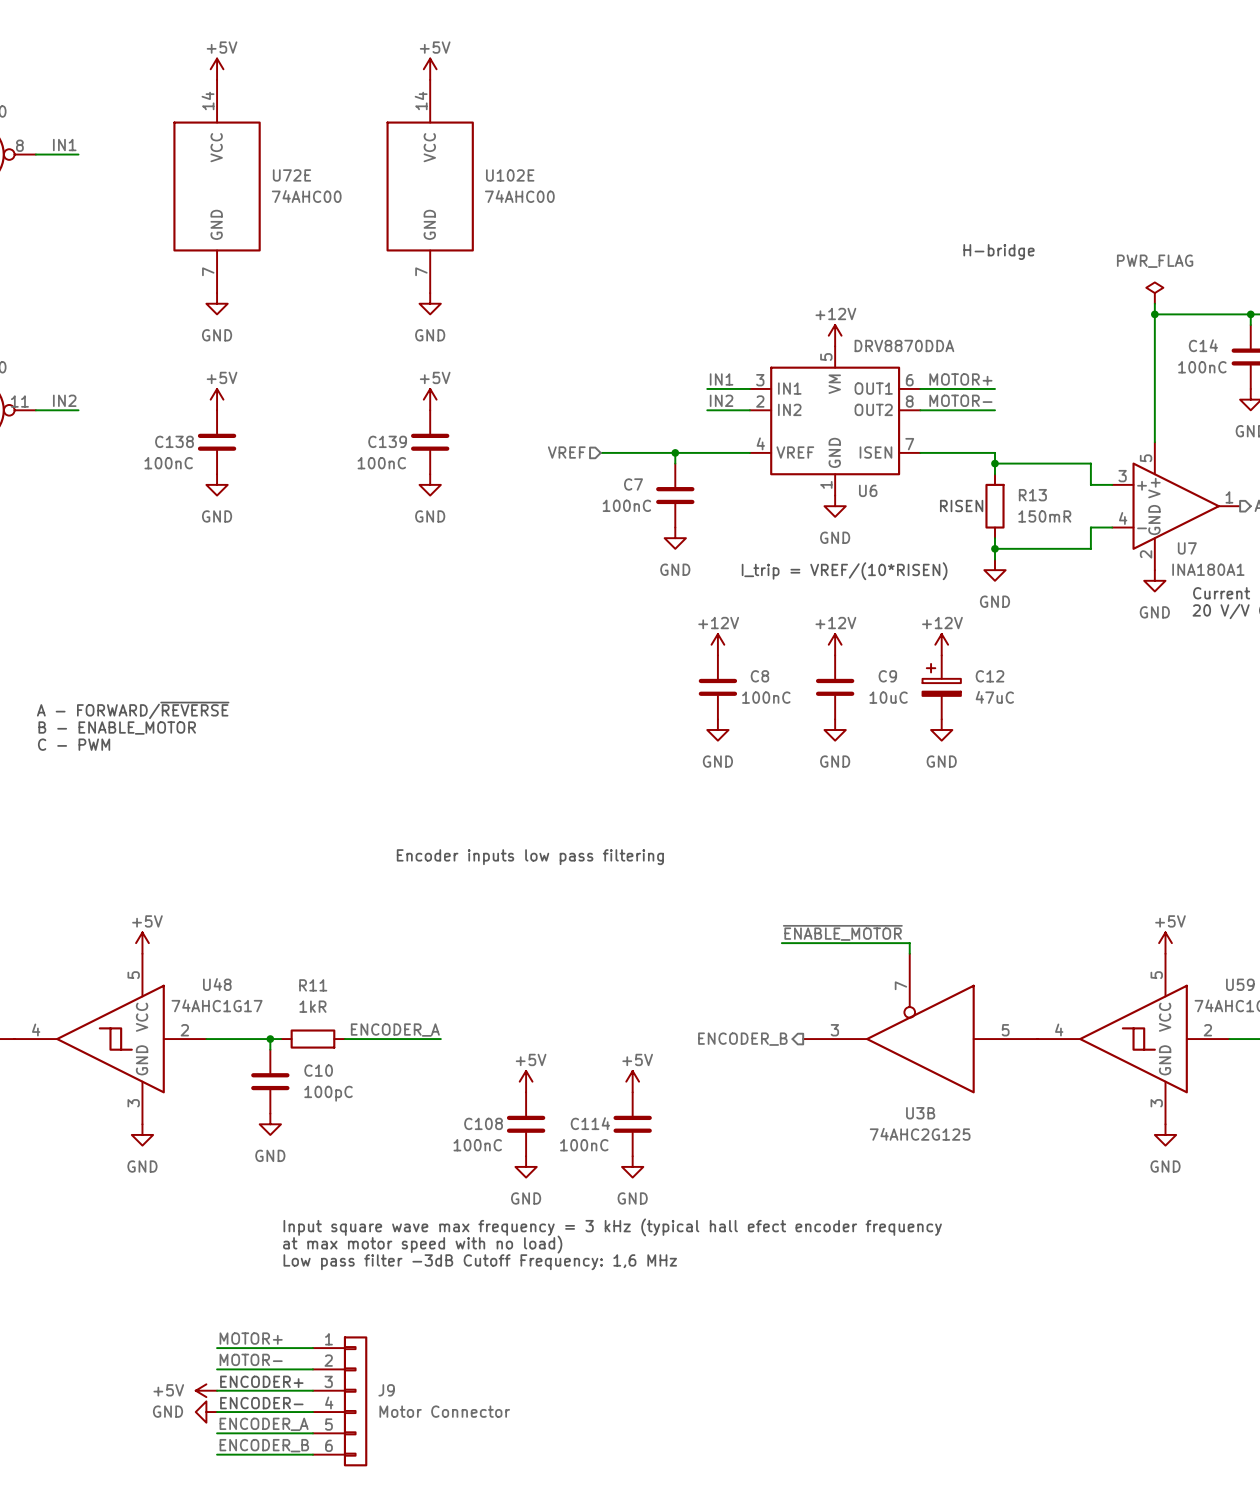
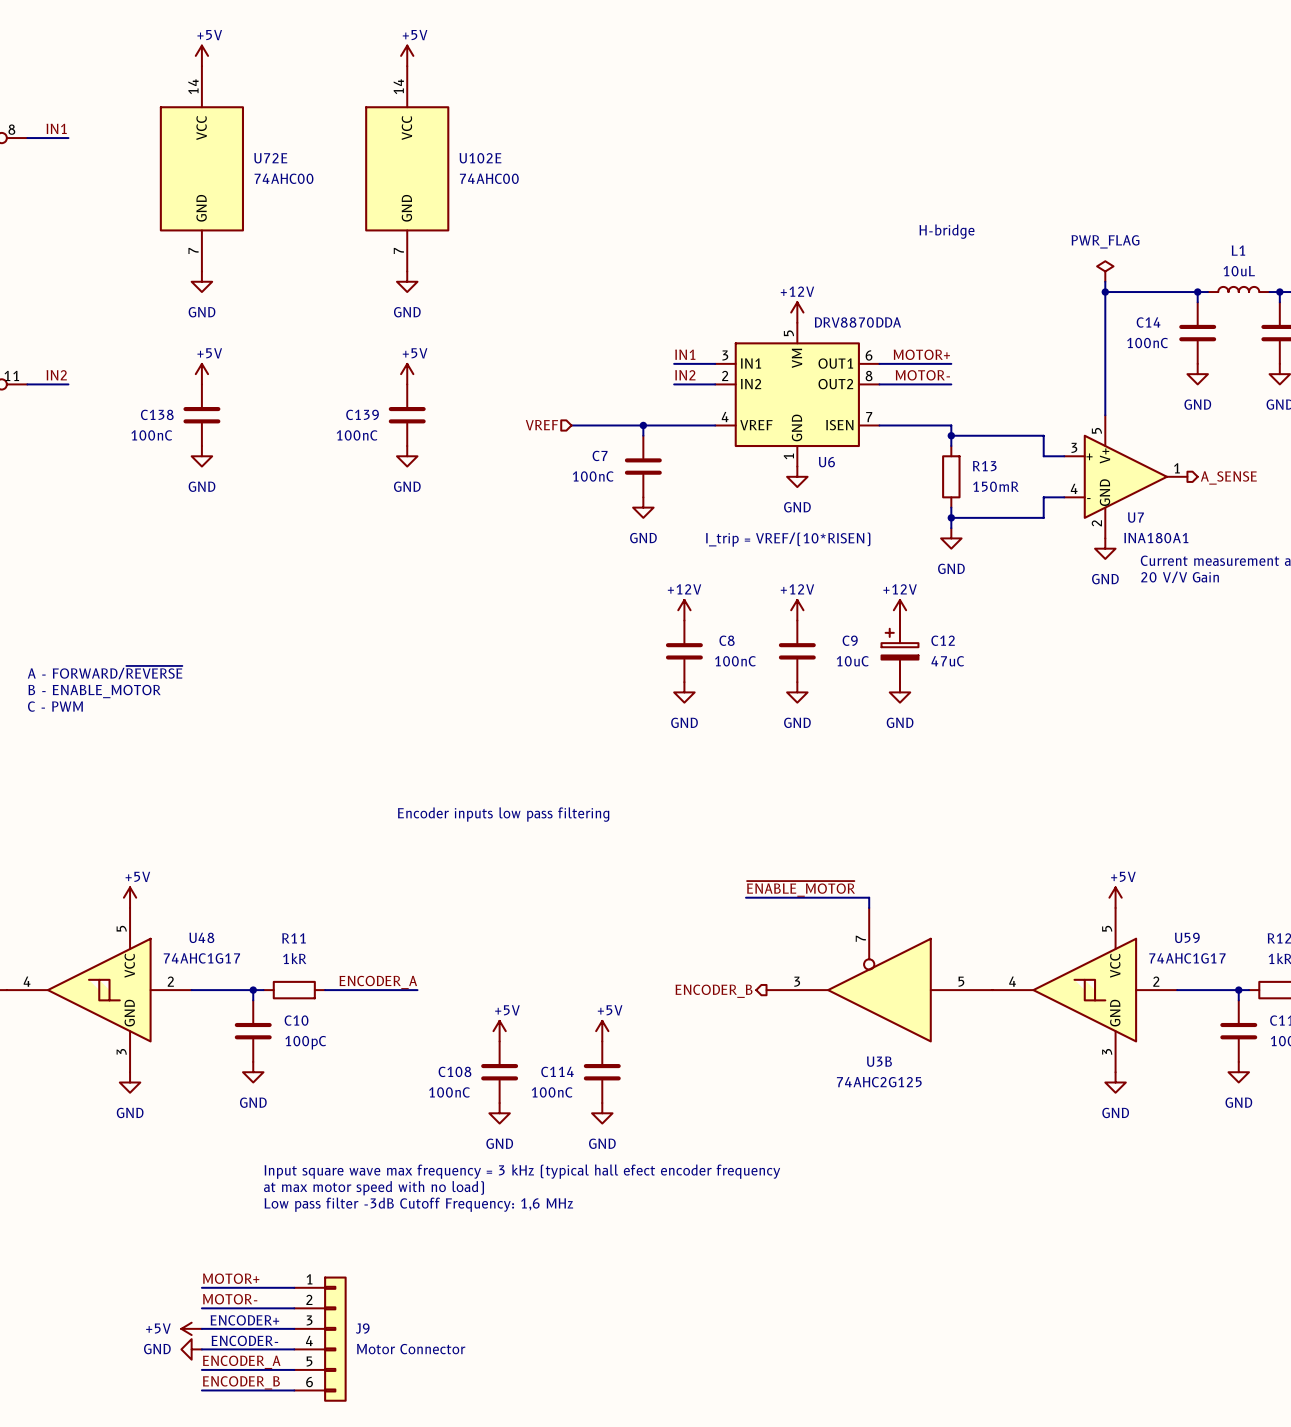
text: RISEN (961, 506) -> none

